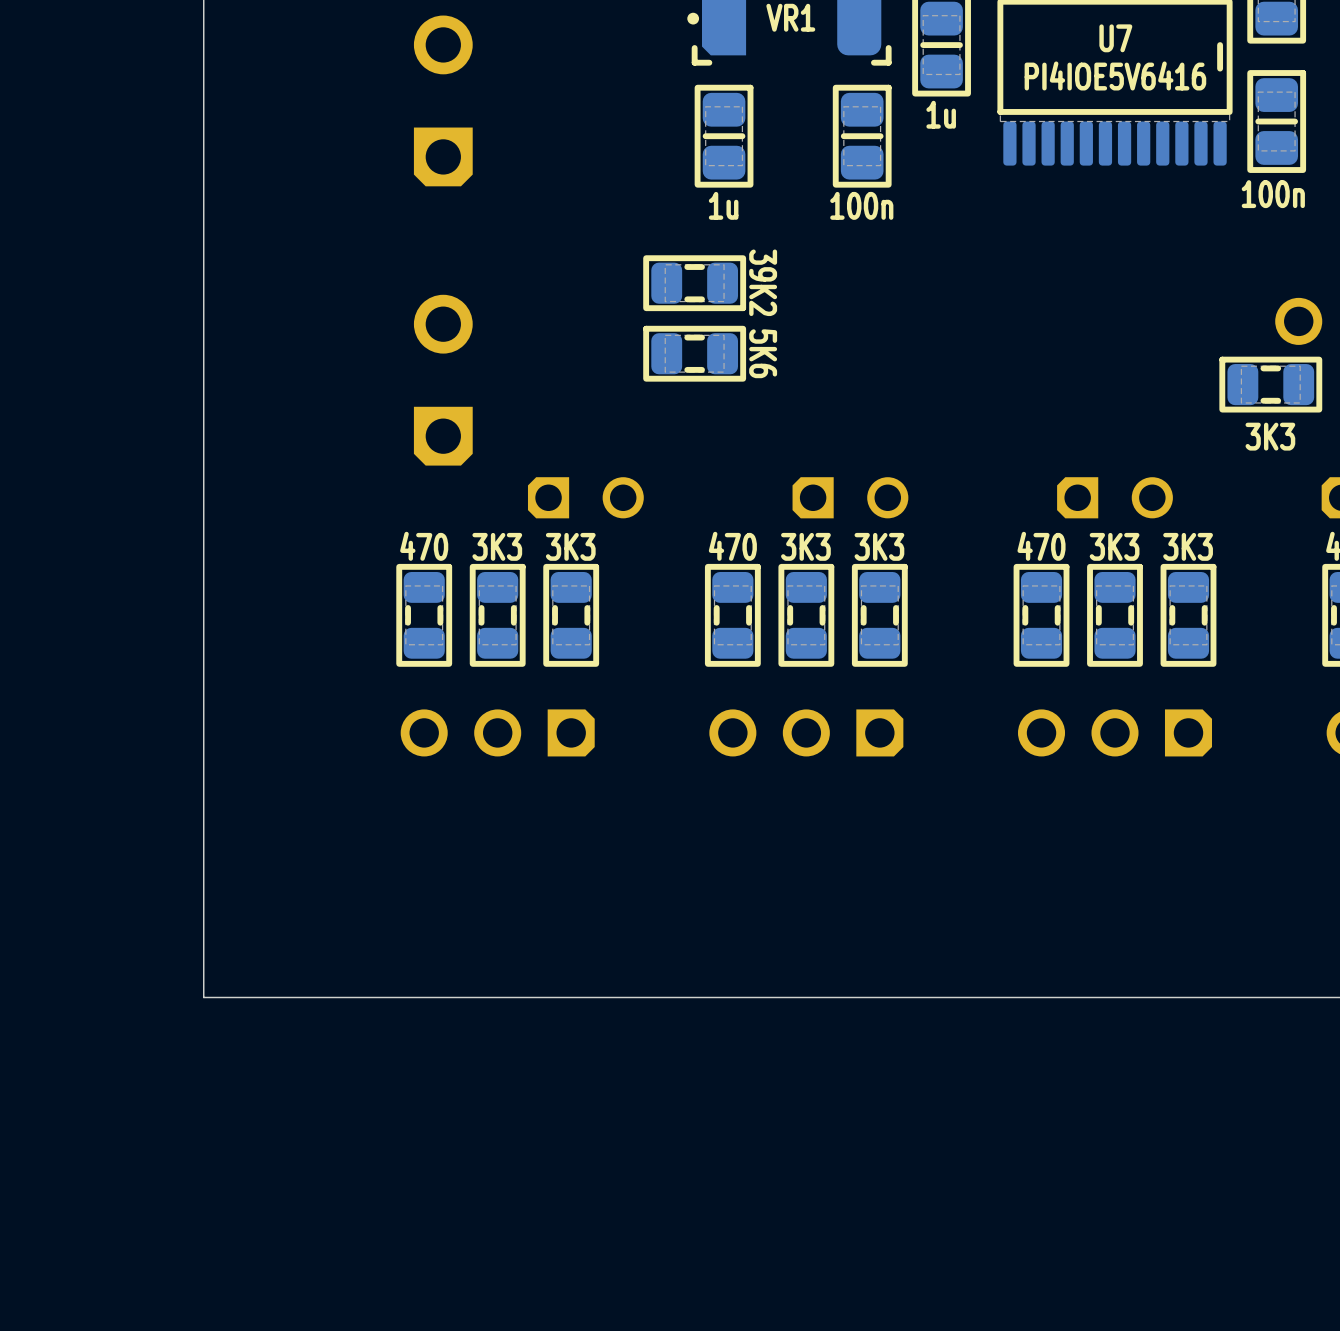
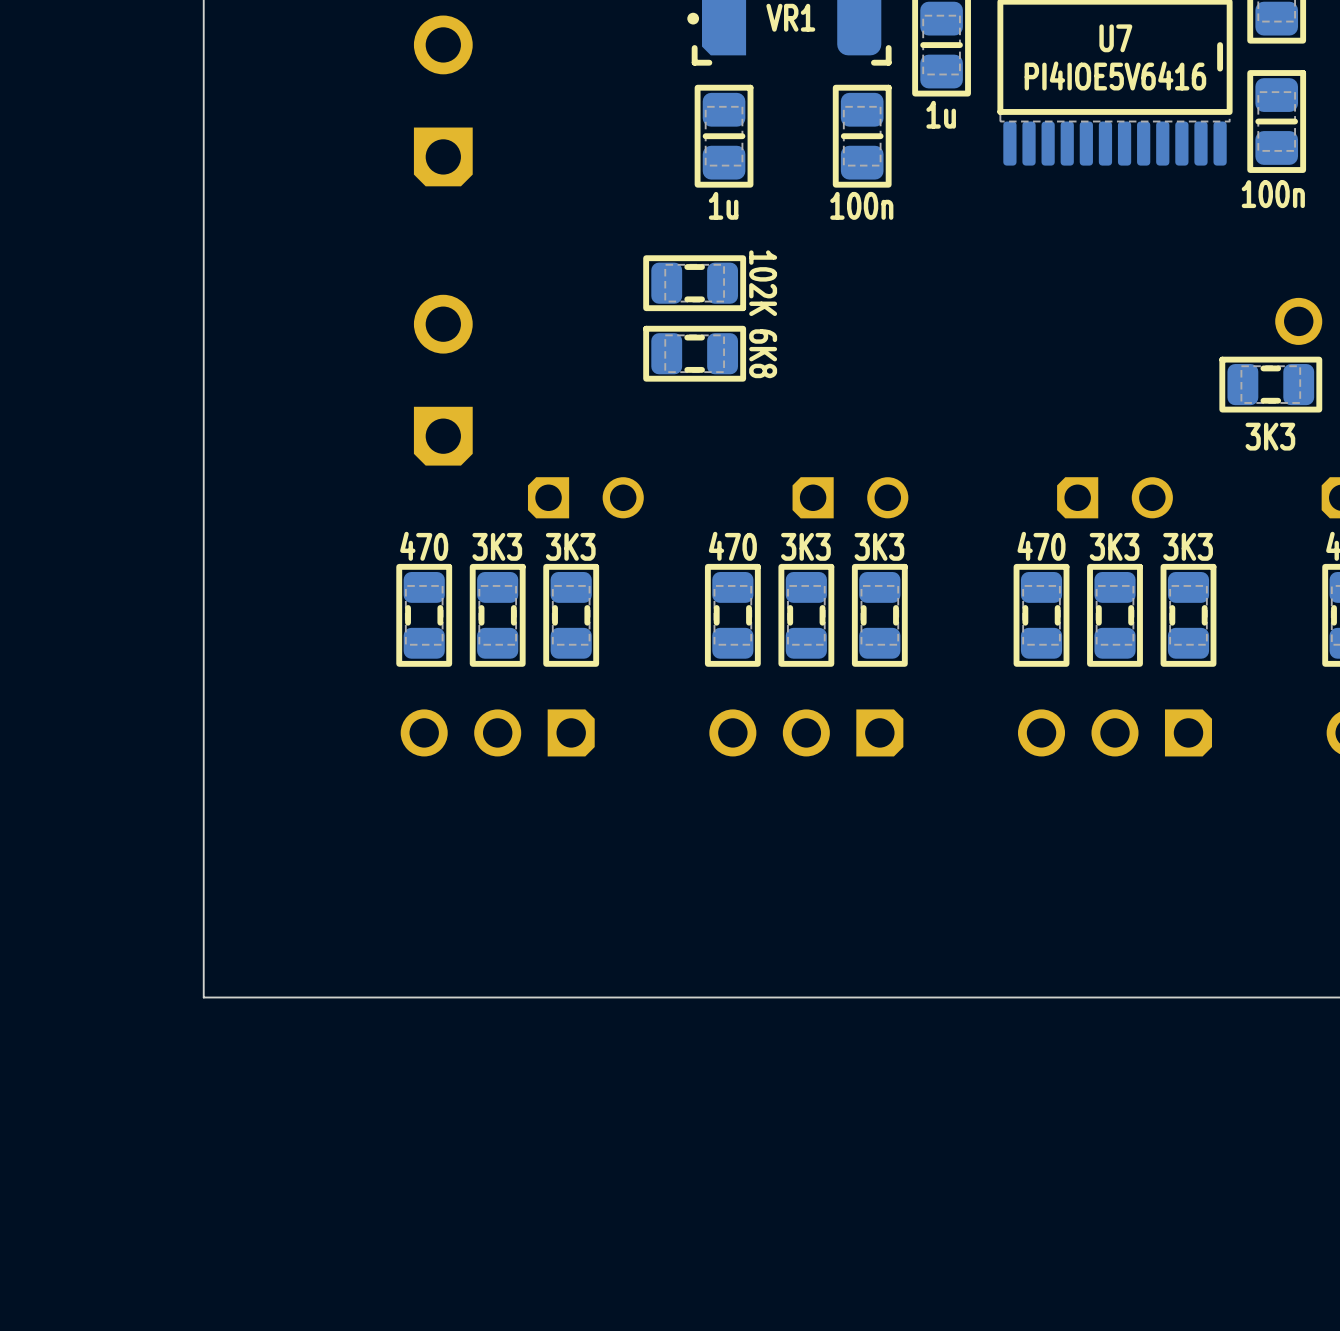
part value: 39K2 (763, 282) -> 102K (763, 283)
part value: 5K6 (763, 353) -> 6K8 (763, 353)

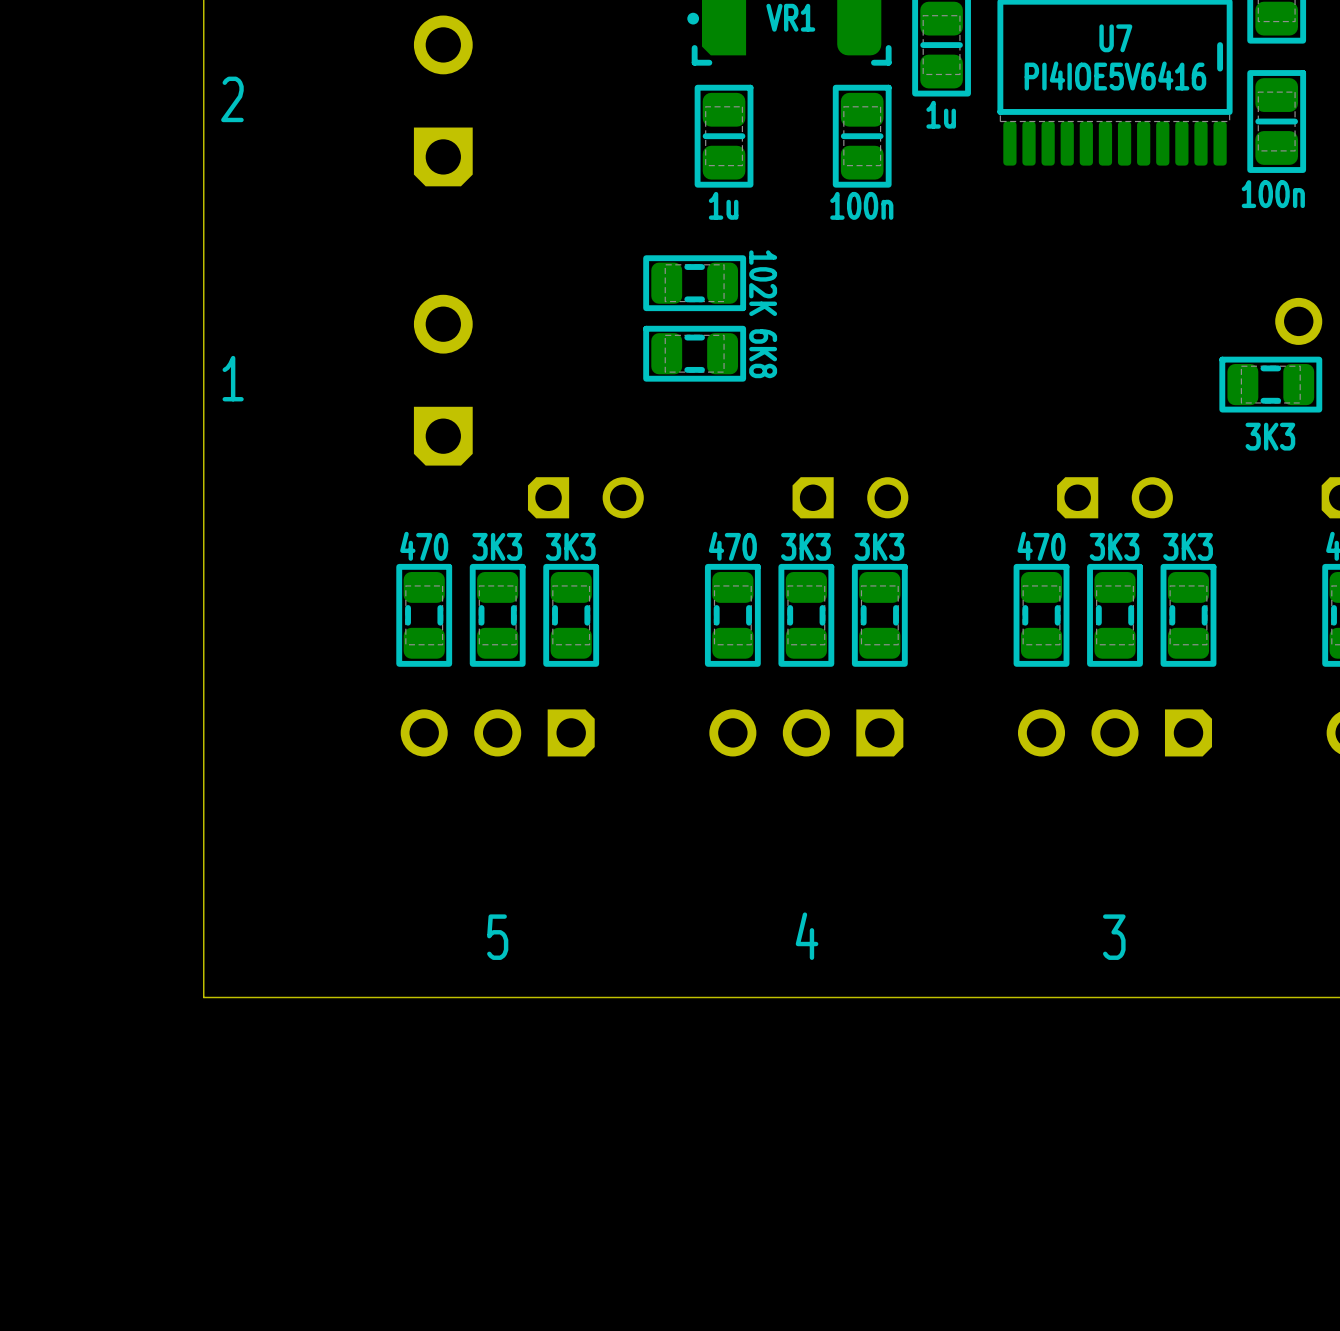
text: none -> 2 (232, 99)
text: none -> 1 (233, 378)
text: none -> 4 (807, 936)
text: none -> 5 (497, 937)
text: none -> 3 (1114, 937)

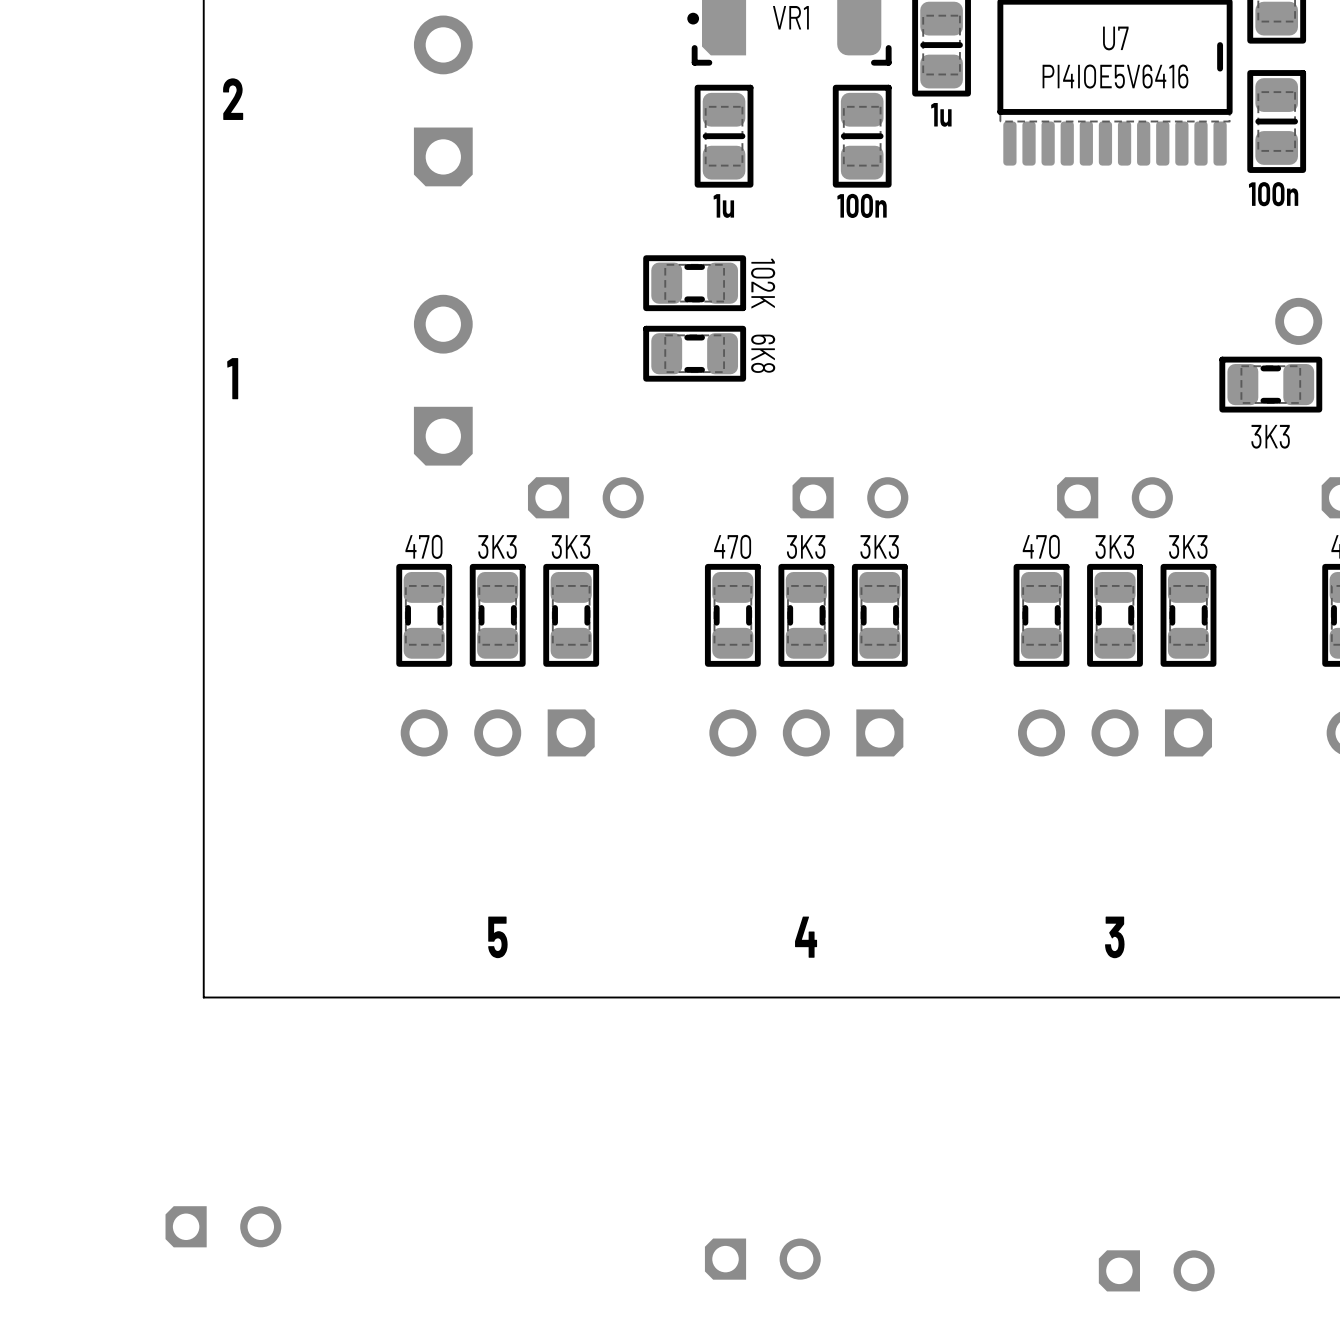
part: none -> (223, 1226)
part: none -> (762, 1259)
part: none -> (1156, 1270)

